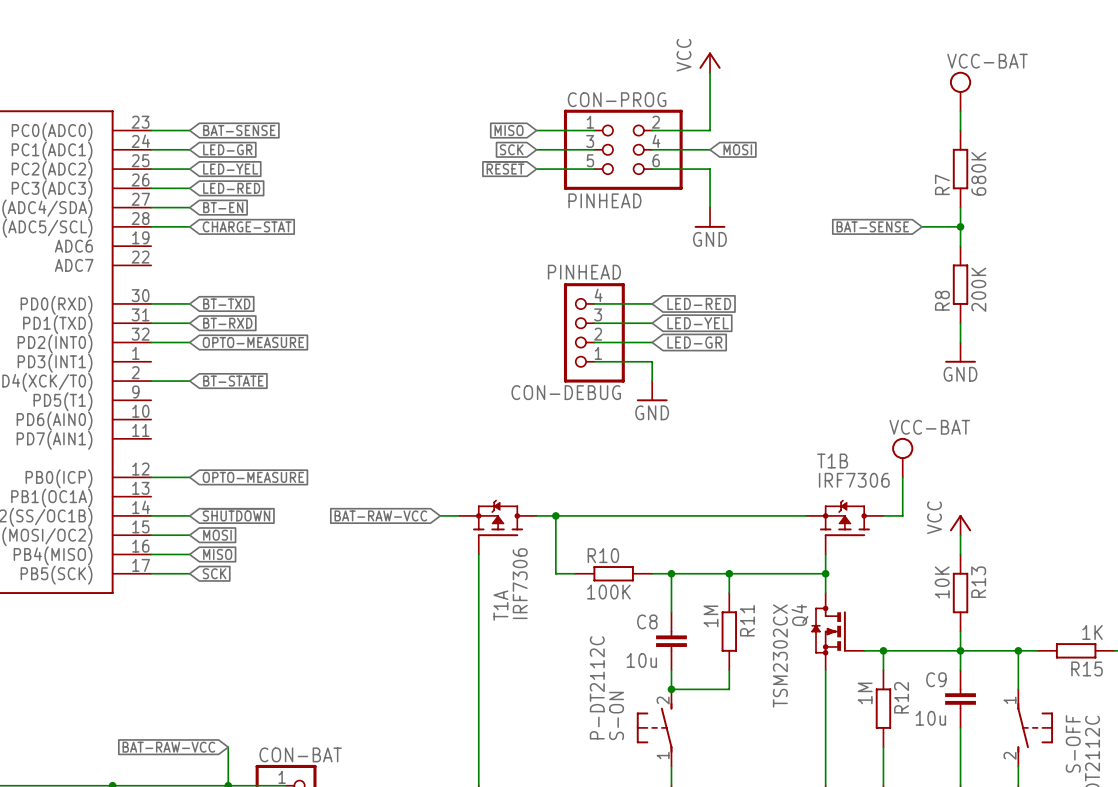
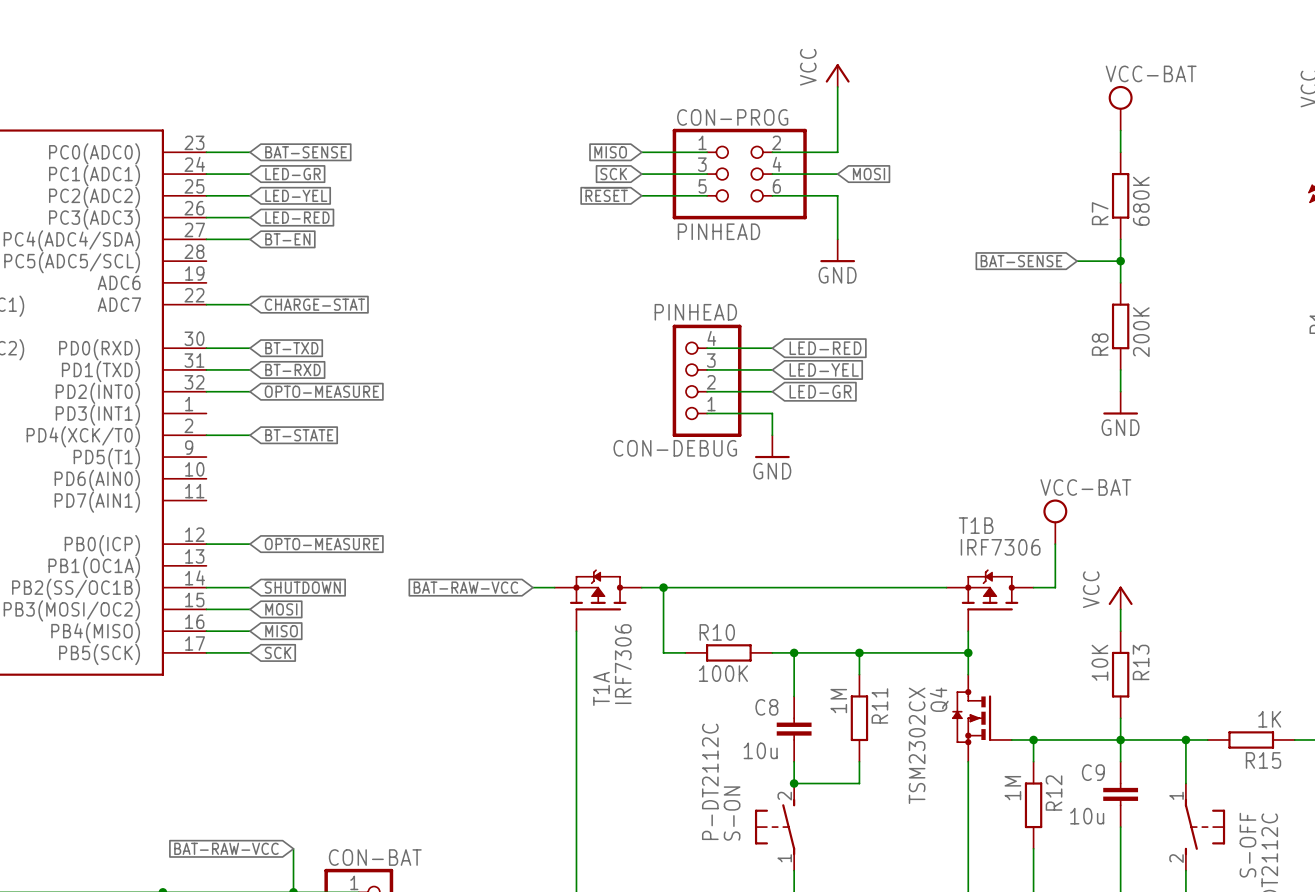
wire: (151, 226) (189, 226) -> (206, 304) (249, 304)
global label position: CHARGE-STAT (247, 226) -> CHARGE-STAT (314, 304)

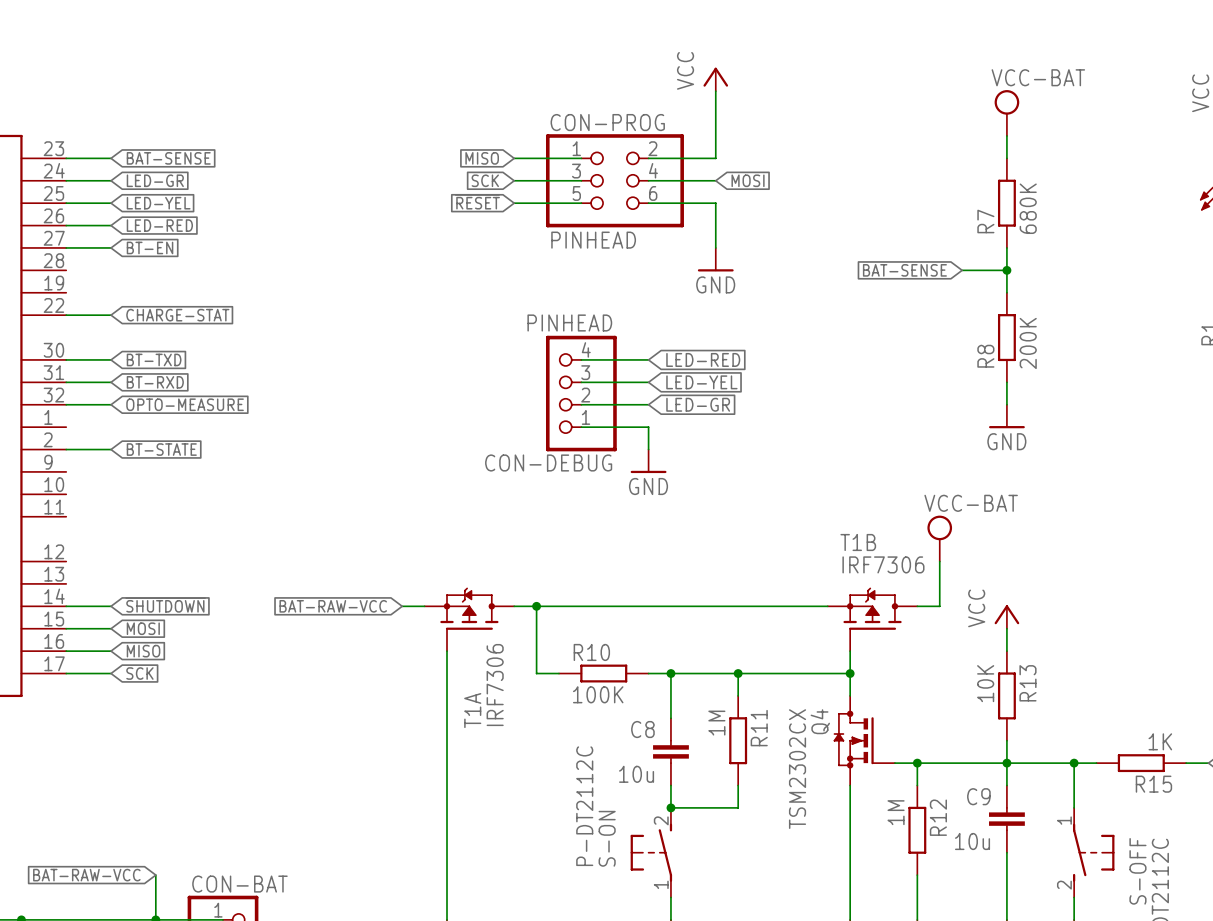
wire: (206, 544) (249, 544) -> none
global label: OPTO-MEASURE (321, 544) -> none

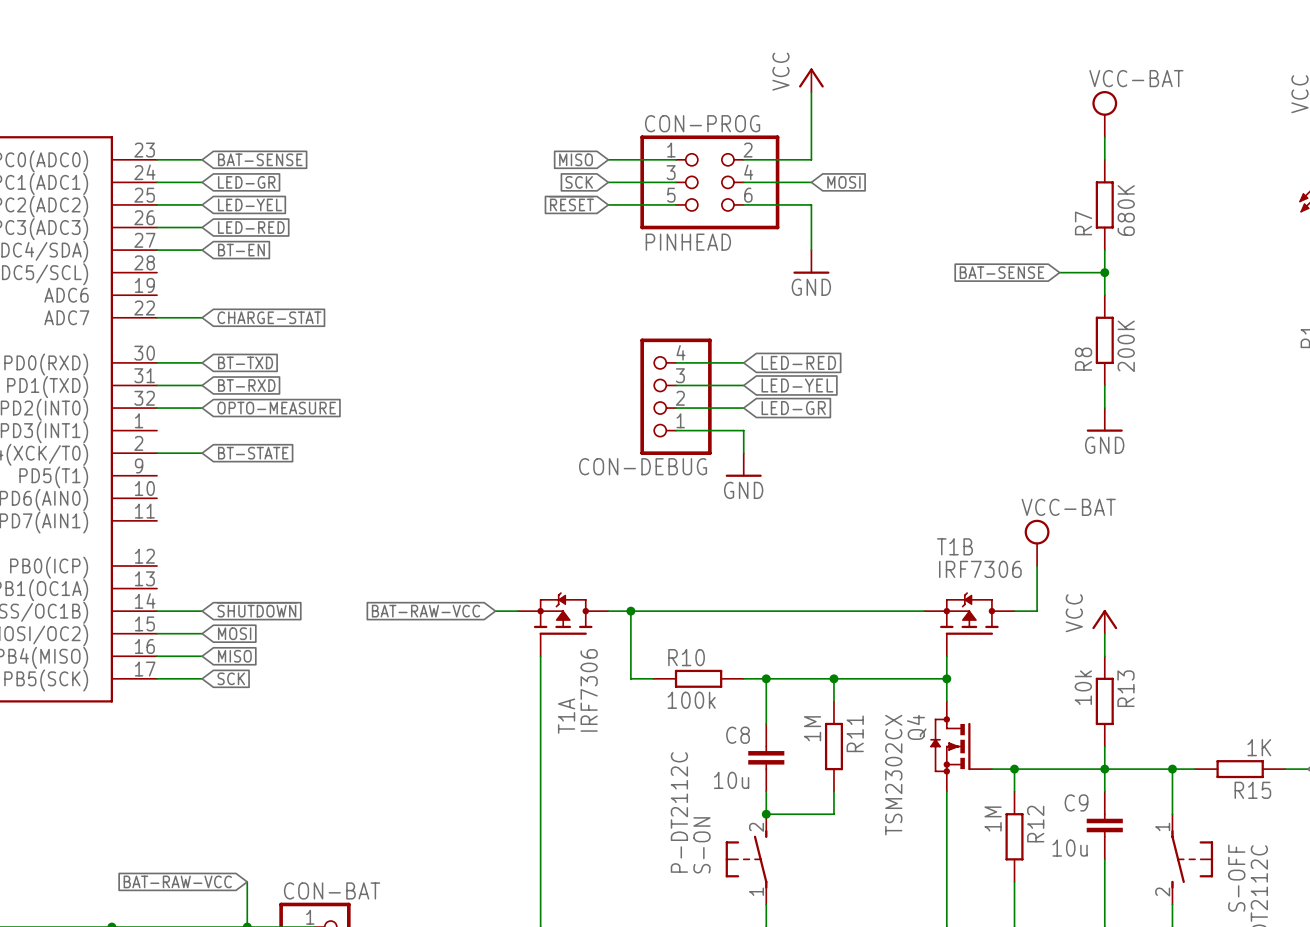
CON-DEBUG value: PINHEAD (569, 323) -> none
R13 value: 10K (985, 683) -> 10k (1083, 687)
R10 value: 100K (598, 694) -> 100k (691, 700)

